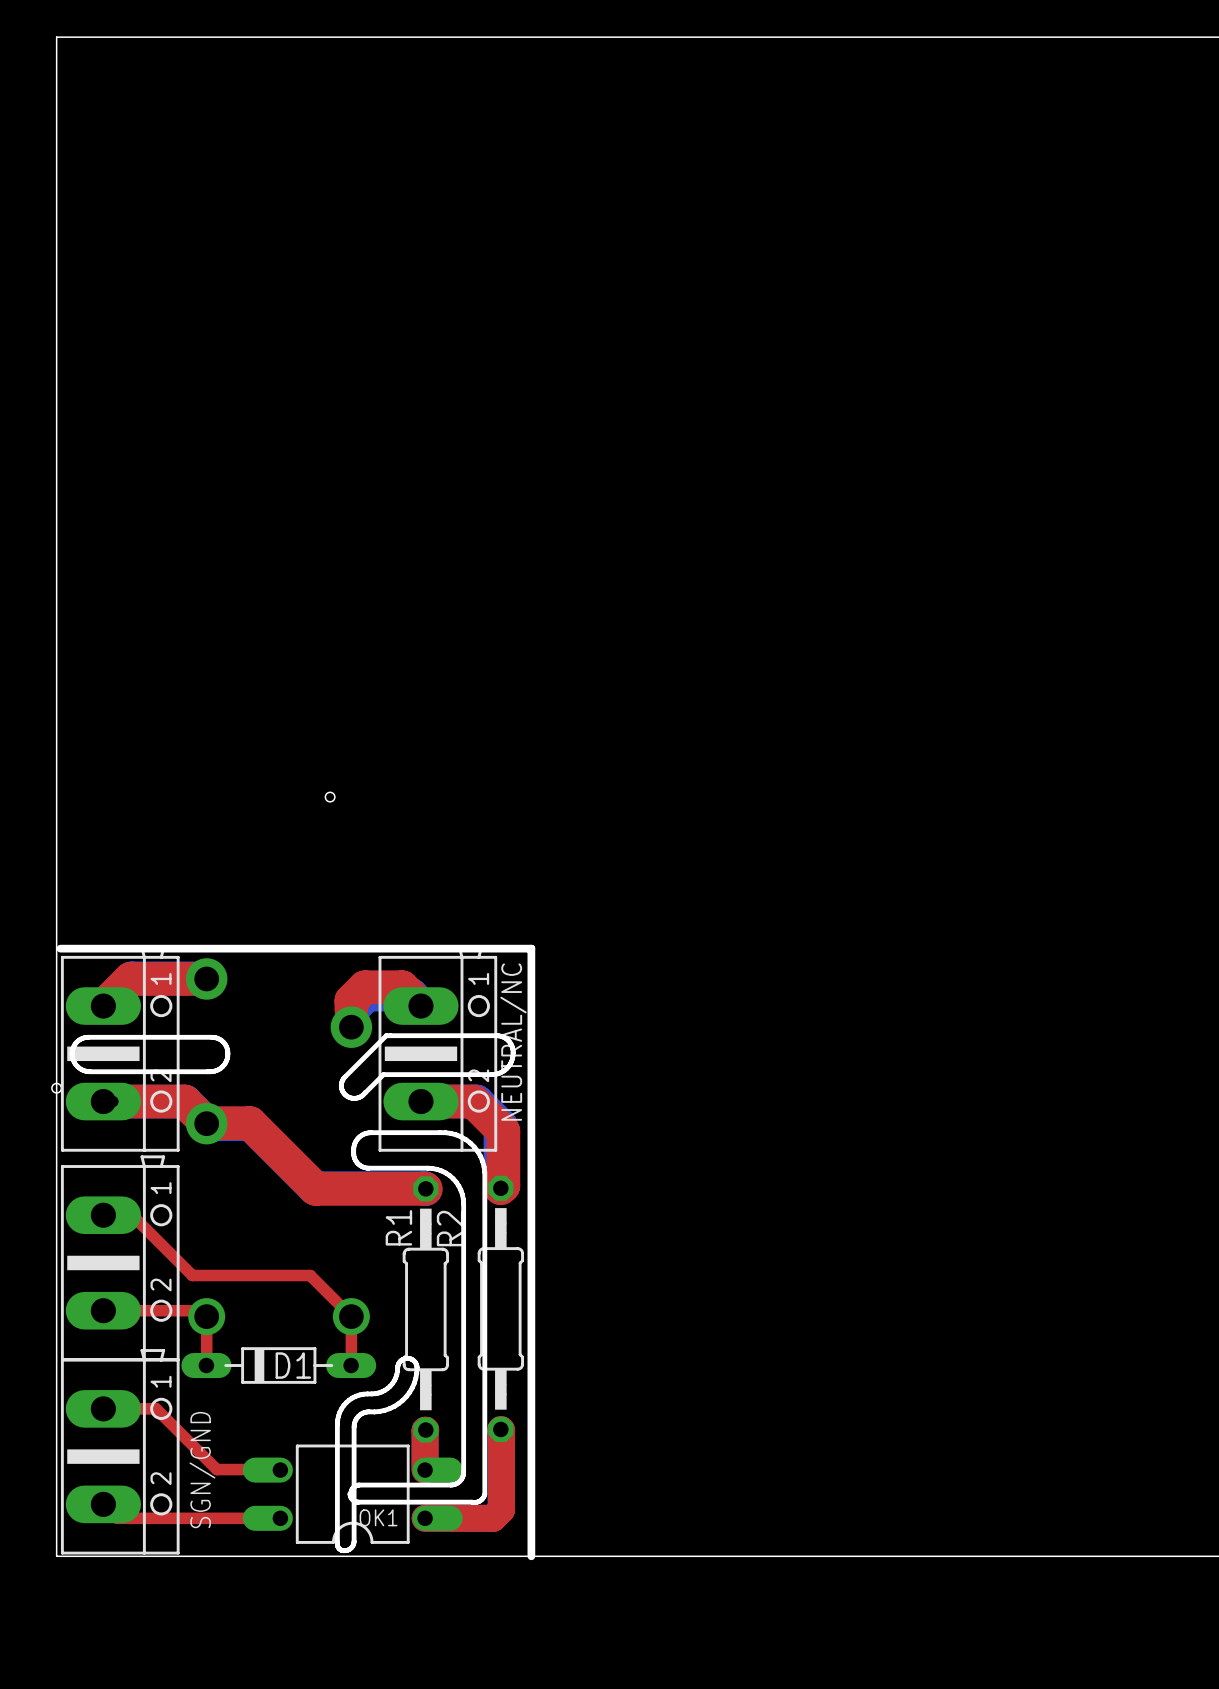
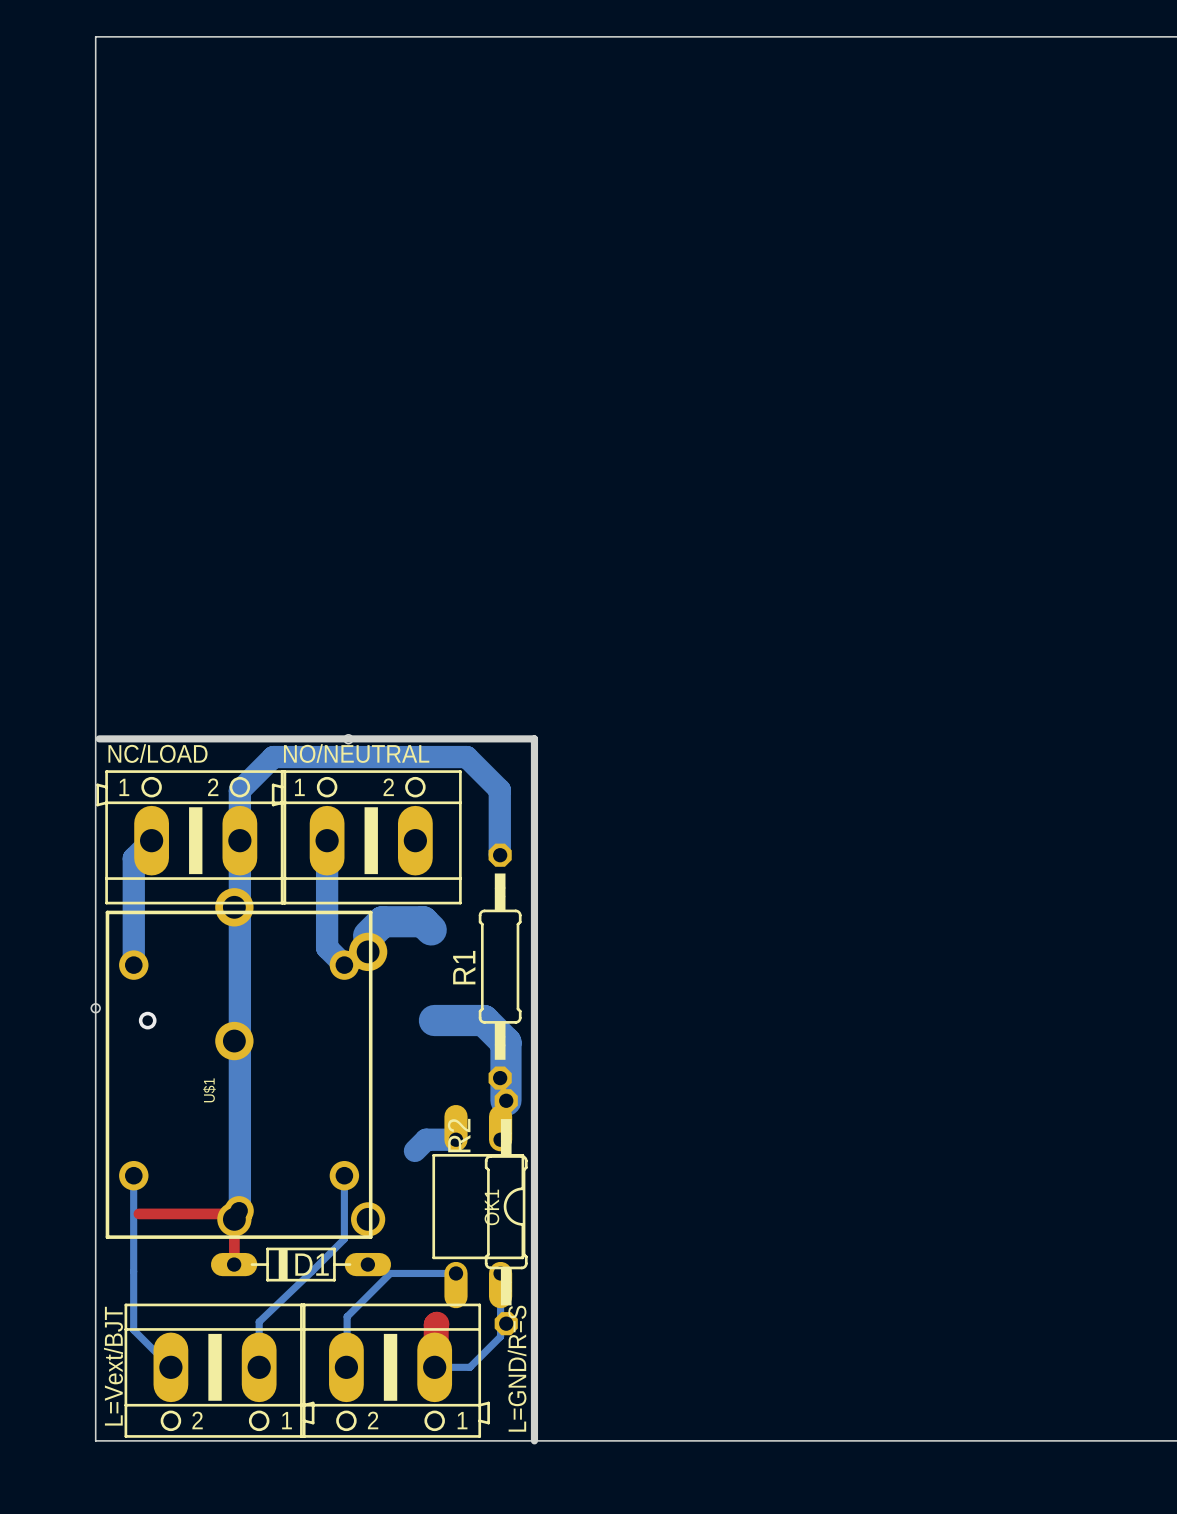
NC/LOAD: none -> (191, 837)
NO/NEUTRAL: none -> (366, 837)
bottom track: none -> (151, 840) (133, 858) (133, 965)
bottom track: none -> (327, 840) (327, 947) (344, 965)
bottom track: none -> (500, 855) (499, 790) (466, 757) (273, 757) (239, 790) (239, 1210)
board edge: (60, 948) (531, 948) -> (99, 738) (534, 738) (534, 879)
top track: (206, 978) (130, 978) (103, 1006) -> none
top track: (420, 1006) (402, 987) (364, 987) (351, 1000) (351, 1027) -> none
part: (120, 1048) -> none
NEUTRAL/NC: (437, 1048) -> none
board edge: (72, 1053) (75, 1043) (86, 1037) (211, 1037) (223, 1041) (227, 1054) (222, 1066) (212, 1071) (90, 1071) (77, 1066) (72, 1053) -> none
board edge: (365, 1092) (358, 1097) (349, 1097) (342, 1091) (341, 1081) (386, 1035) (498, 1035) (508, 1040) (512, 1047) (512, 1056) (510, 1064) (504, 1070) (497, 1073) (383, 1074) (365, 1092) -> none
top track: (103, 1101) (184, 1101) (206, 1123) (250, 1123) (315, 1188) (425, 1188) -> none
top track: (420, 1101) (473, 1101) (503, 1131) (503, 1185) (500, 1188) -> none
board edge: (370, 1132) (362, 1135) (354, 1143) (354, 1156) (359, 1165) (368, 1168) (437, 1169) (453, 1178) (462, 1194) (463, 1472) (460, 1480) (454, 1484) (358, 1485) (352, 1488) (350, 1495) (353, 1500) (358, 1502) (477, 1502) (484, 1494) (484, 1172) (482, 1161) (470, 1143) (450, 1133) (370, 1132) -> none
U$1: none -> (239, 1074)
top track: (103, 1215) (132, 1215) (192, 1275) (310, 1275) (351, 1316) (351, 1365) -> none
R1 name position: R1 (398, 1227) -> R1 (464, 967)
bottom track: none -> (456, 1139) (426, 1139) (414, 1150)
part: (120, 1258) -> none
bottom track: none -> (133, 1175) (133, 1330) (170, 1367)
bottom track: none -> (344, 1175) (344, 1239) (259, 1321) (259, 1367)
R1 position: (425, 1309) -> (500, 966)
bottom track: none -> (456, 1273) (390, 1273) (347, 1316) (346, 1367)
bottom track: none -> (500, 1273) (500, 1336) (469, 1367) (434, 1367)
top track: (103, 1408) (156, 1408) (216, 1469) (280, 1470) -> none
top track: (500, 1429) (501, 1510) (493, 1518) (425, 1518) -> none
part: (120, 1451) -> none
text: SGN/GND (202, 1470) -> none
part: none -> (219, 1370)
part: none -> (395, 1370)
text: none -> L=Vext/BJT (113, 1366)
text: none -> L=GND/R=S (517, 1368)
OK1 rotation: 0° (352, 1494) -> 90° counterclockwise (478, 1206)
OK1 position: (352, 1494) -> (478, 1206)
top track: (114, 1515) (103, 1504) (117, 1518) (280, 1518) -> none
board edge: (337, 1542) (339, 1548) (344, 1550) (350, 1548) (354, 1542) (355, 1421) (363, 1412) (389, 1408) (406, 1396) (414, 1383) (416, 1373) (416, 1364) (410, 1358) (405, 1358) (400, 1361) (395, 1377) (387, 1388) (378, 1393) (363, 1394) (352, 1397) (346, 1402) (339, 1412) (337, 1424) (337, 1542) -> none

